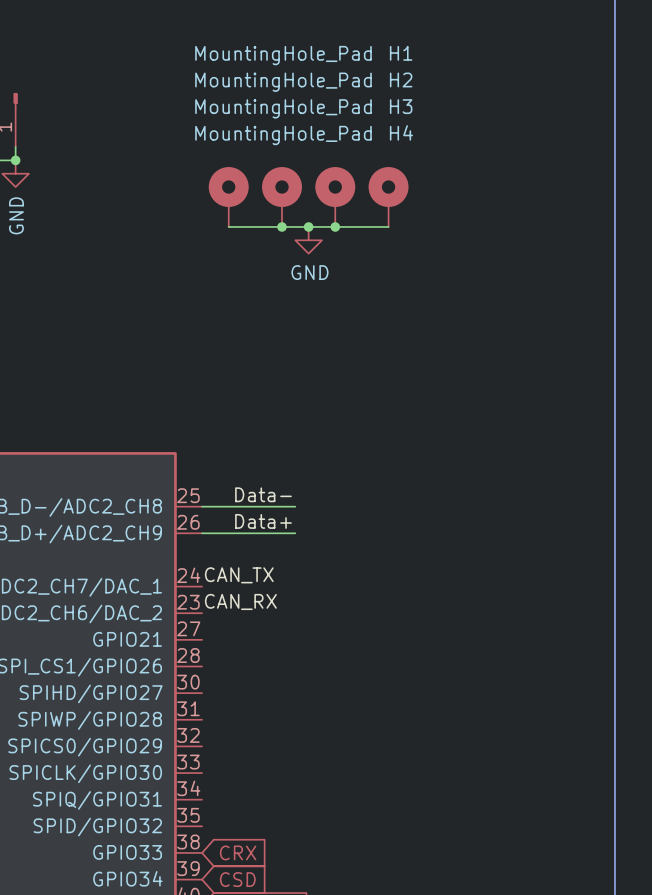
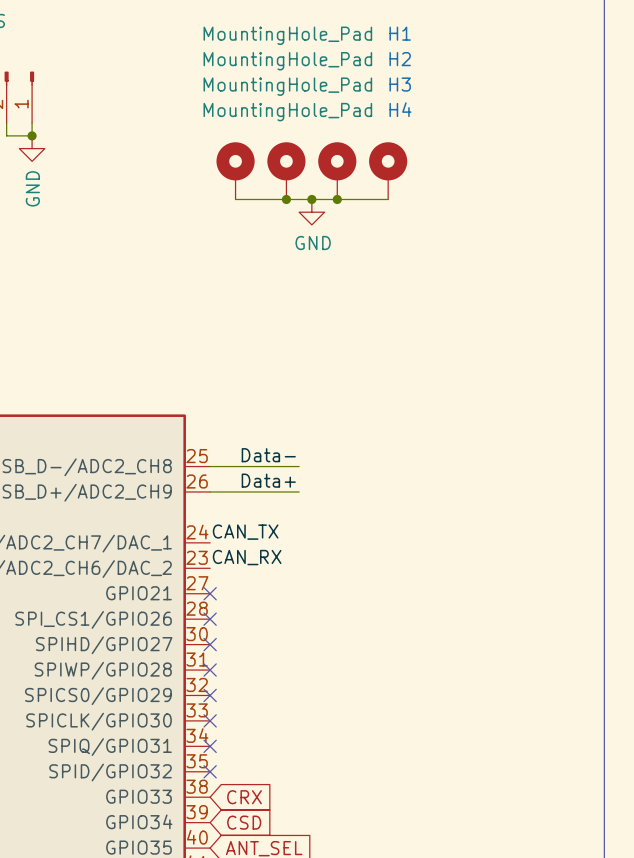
no-connect mark: none -> (210, 593)
no-connect mark: none -> (210, 619)
no-connect mark: none -> (210, 644)
no-connect mark: none -> (210, 670)
no-connect mark: none -> (210, 695)
no-connect mark: none -> (210, 720)
no-connect mark: none -> (210, 746)
no-connect mark: none -> (210, 771)

